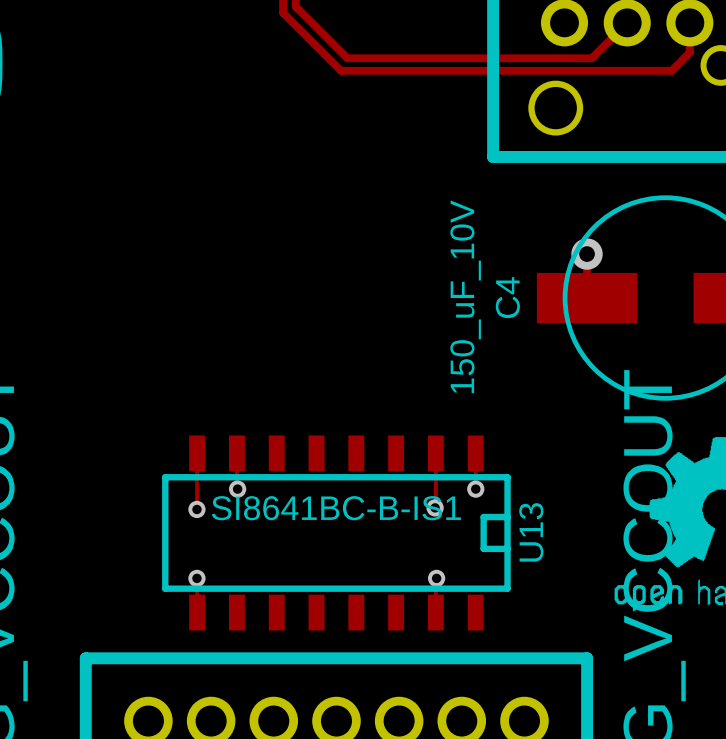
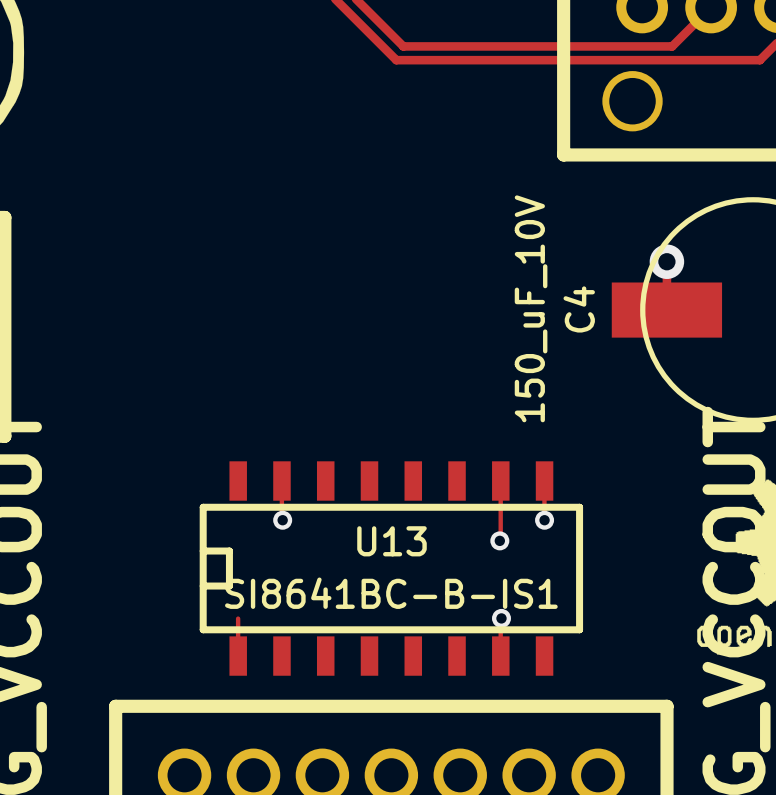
top track: (197, 453) (197, 509) -> none
via: (196, 509) -> none
U13 rotation: 0° (336, 532) -> 180° (391, 568)
U13 name position: U13 (531, 532) -> U13 (391, 541)
via: (196, 578) -> none

